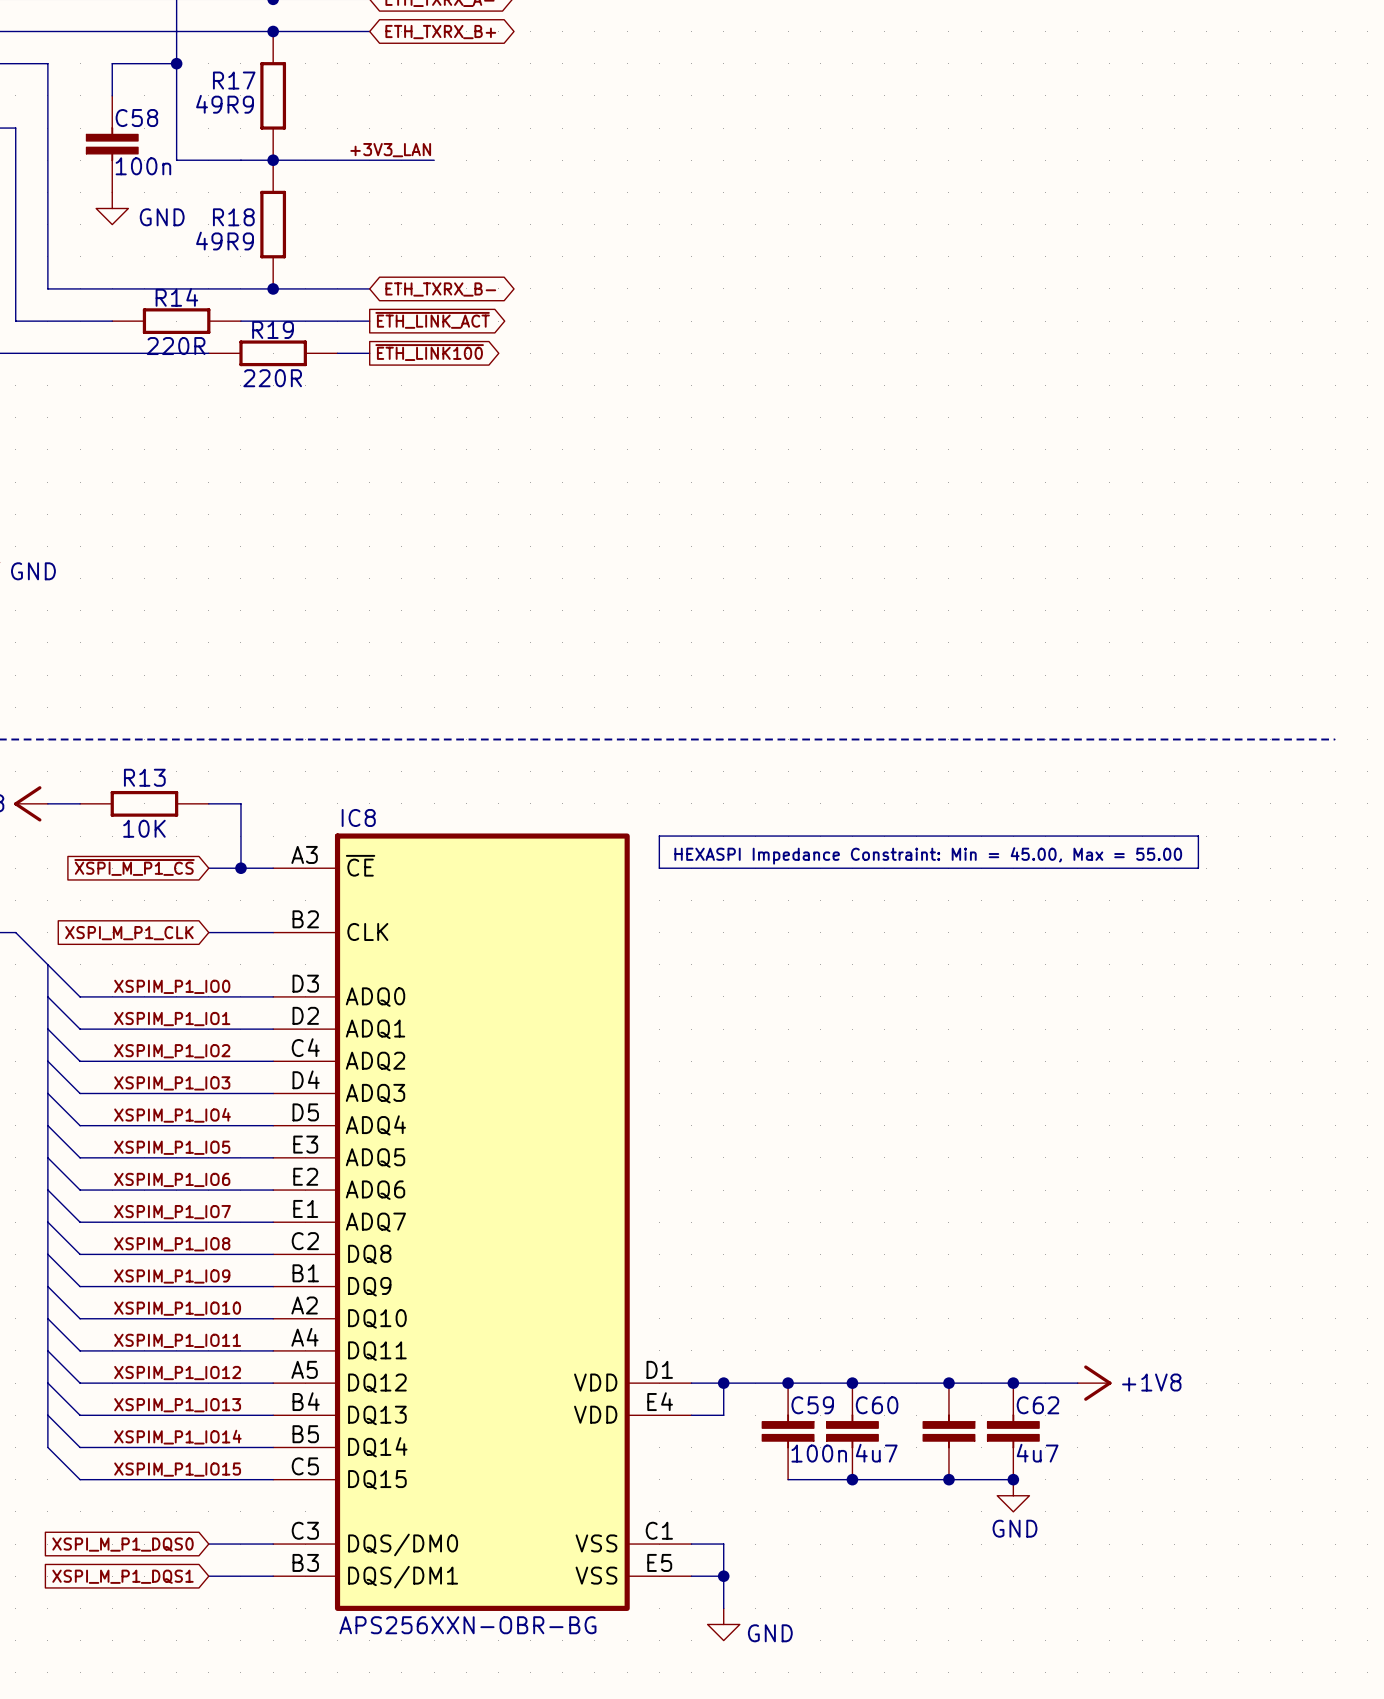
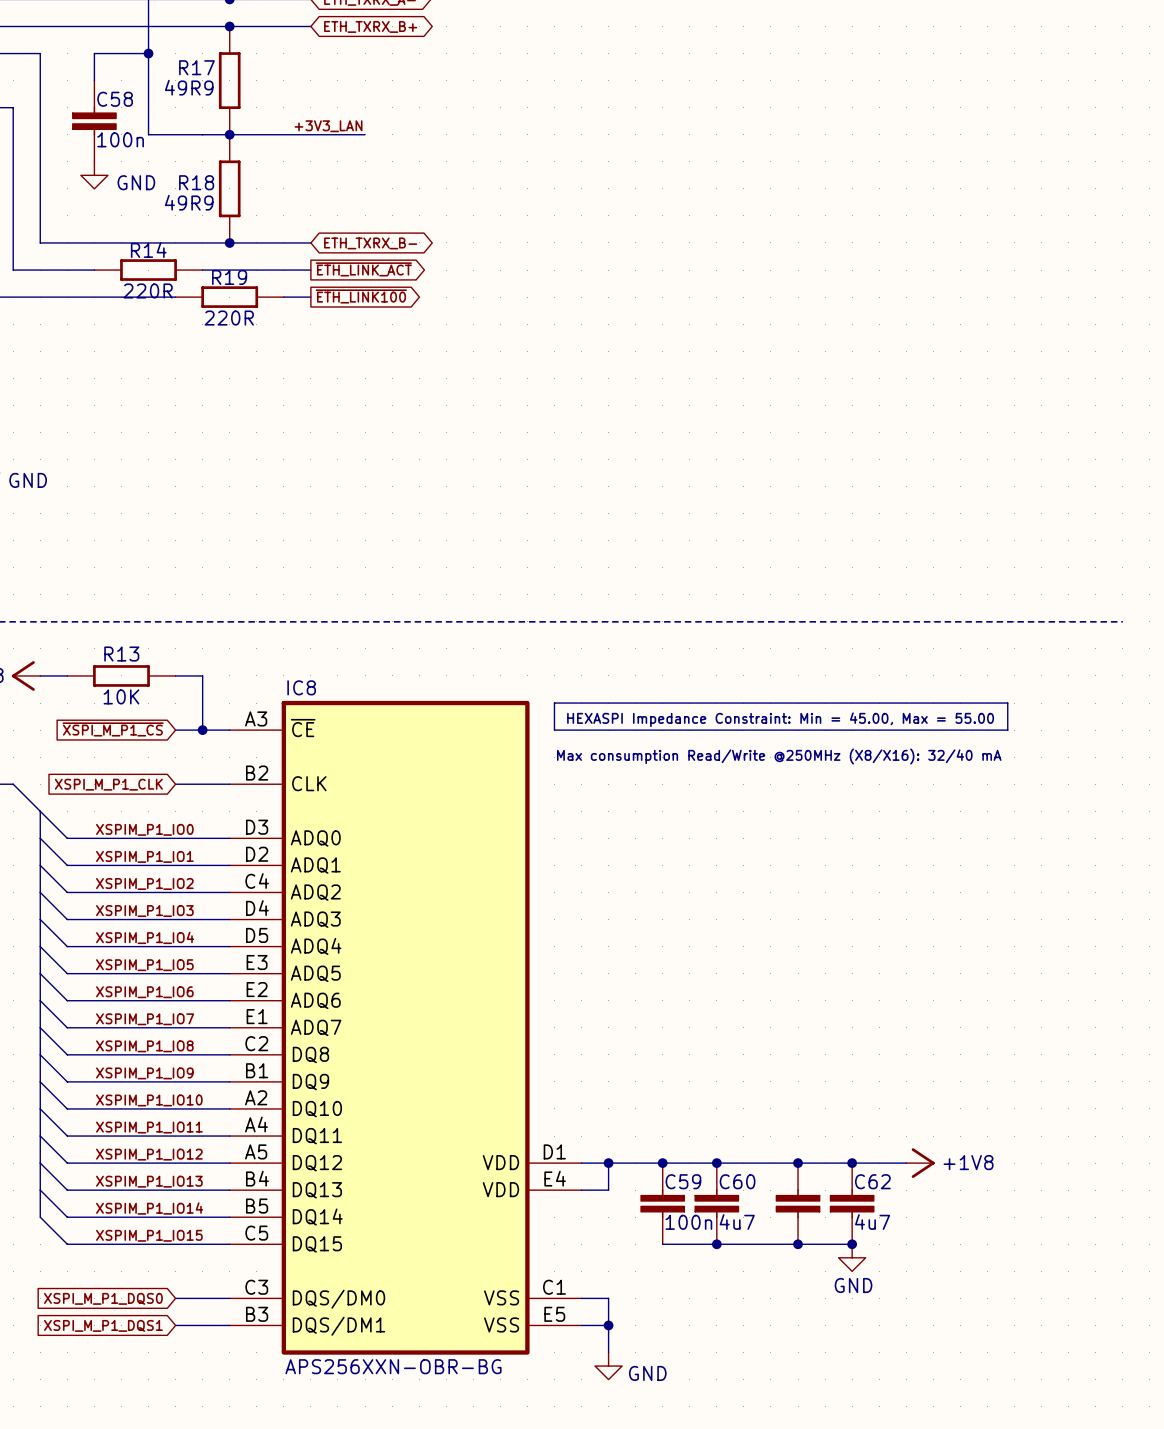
text: none -> Max consumption Read/Write @250MHz (X8/X16): 32/40 mA (779, 756)

